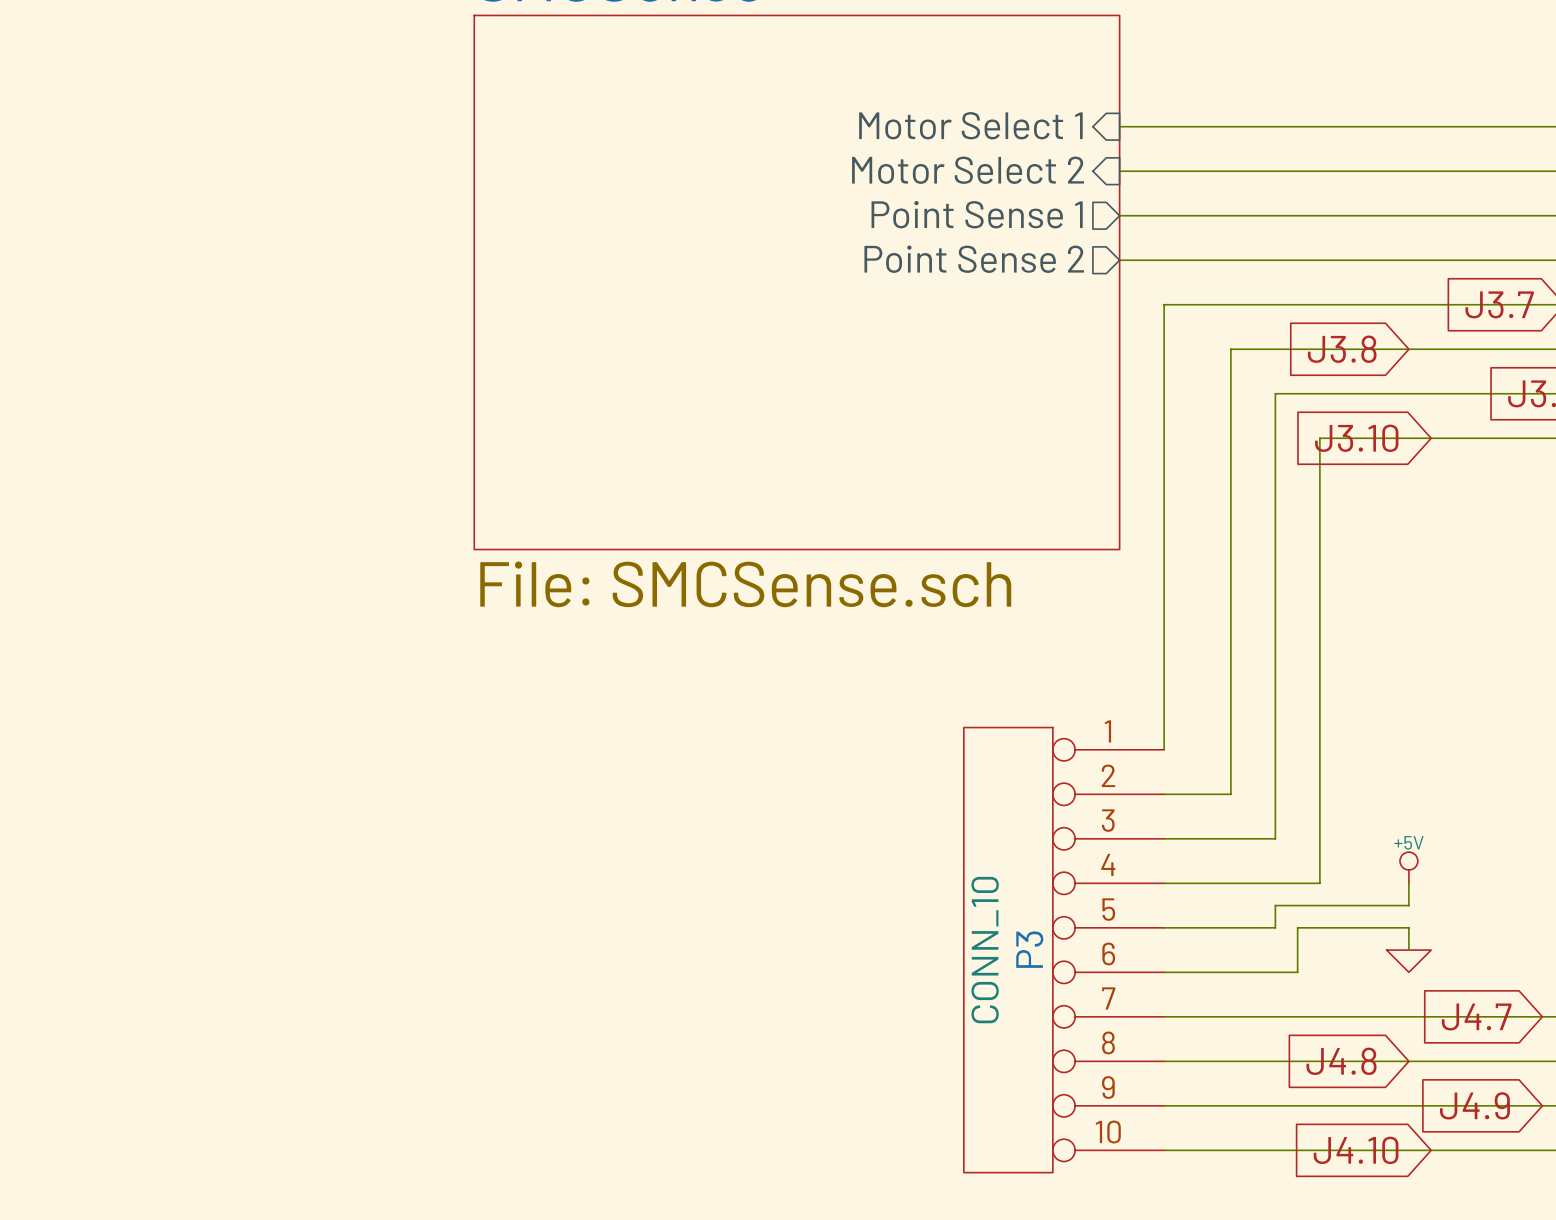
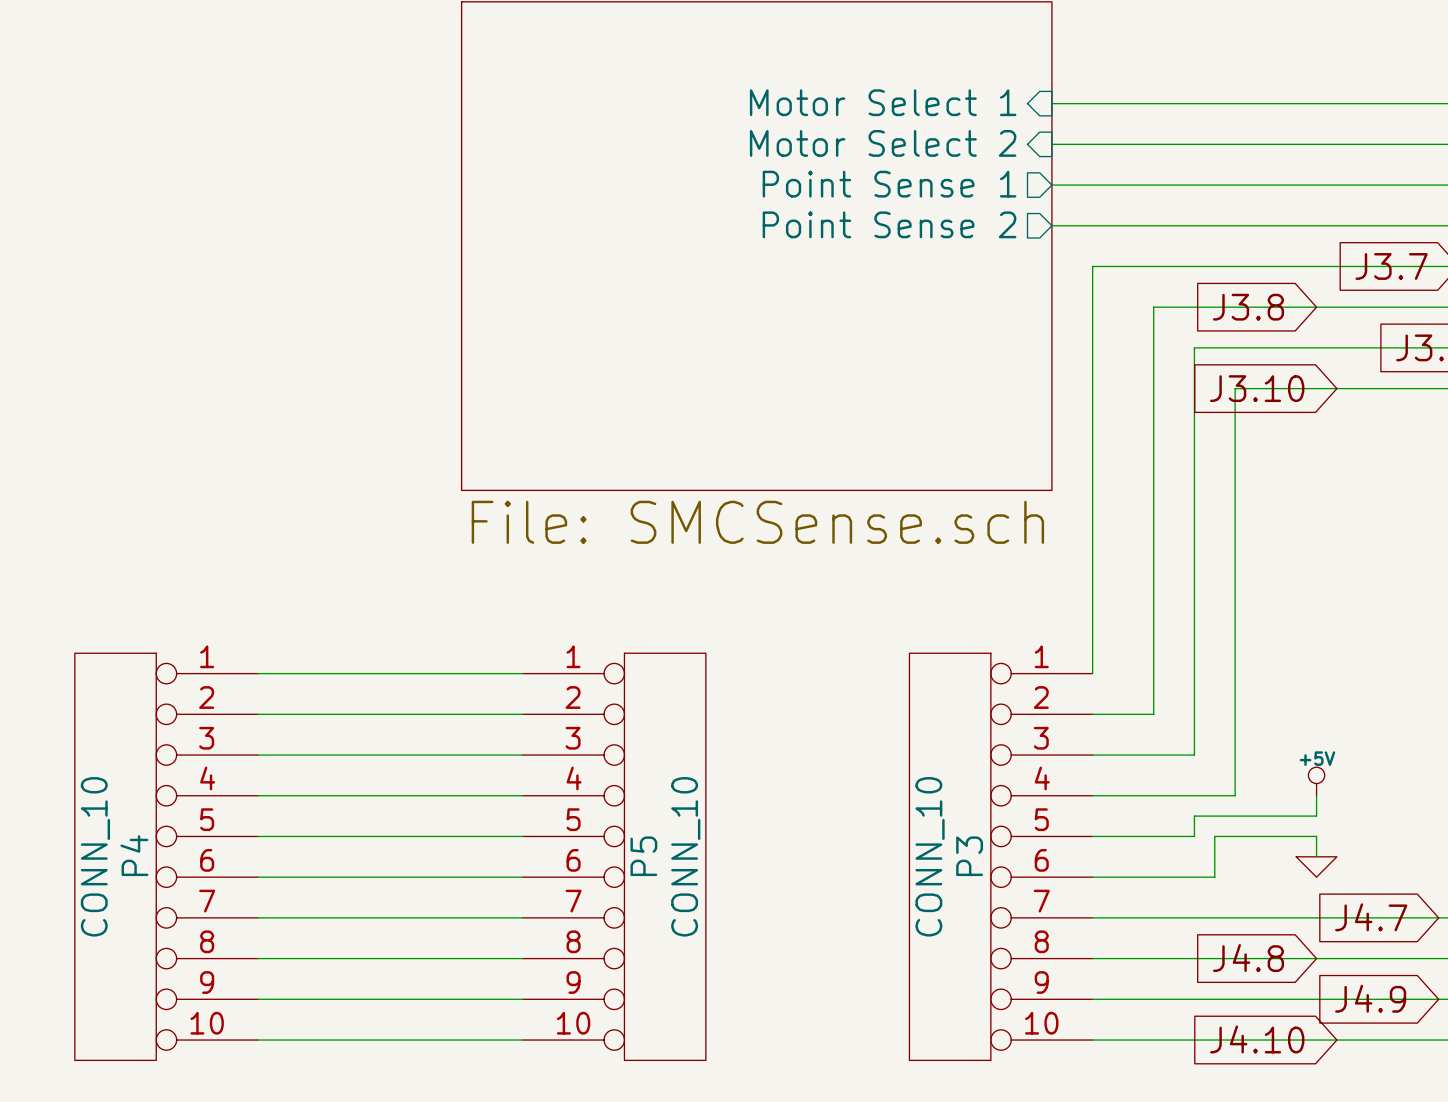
wire: none -> (258, 673) (522, 673)
wire: none -> (258, 714) (522, 714)
wire: none -> (258, 755) (522, 755)
wire: none -> (258, 795) (522, 795)
wire: none -> (258, 836) (522, 836)
P4: none -> CONN_10 (166, 856)
P5: none -> CONN_10 (614, 856)
wire: none -> (258, 877) (522, 877)
wire: none -> (258, 917) (522, 917)
wire: none -> (258, 958) (522, 958)
wire: none -> (258, 999) (522, 999)
wire: none -> (258, 1040) (522, 1040)

